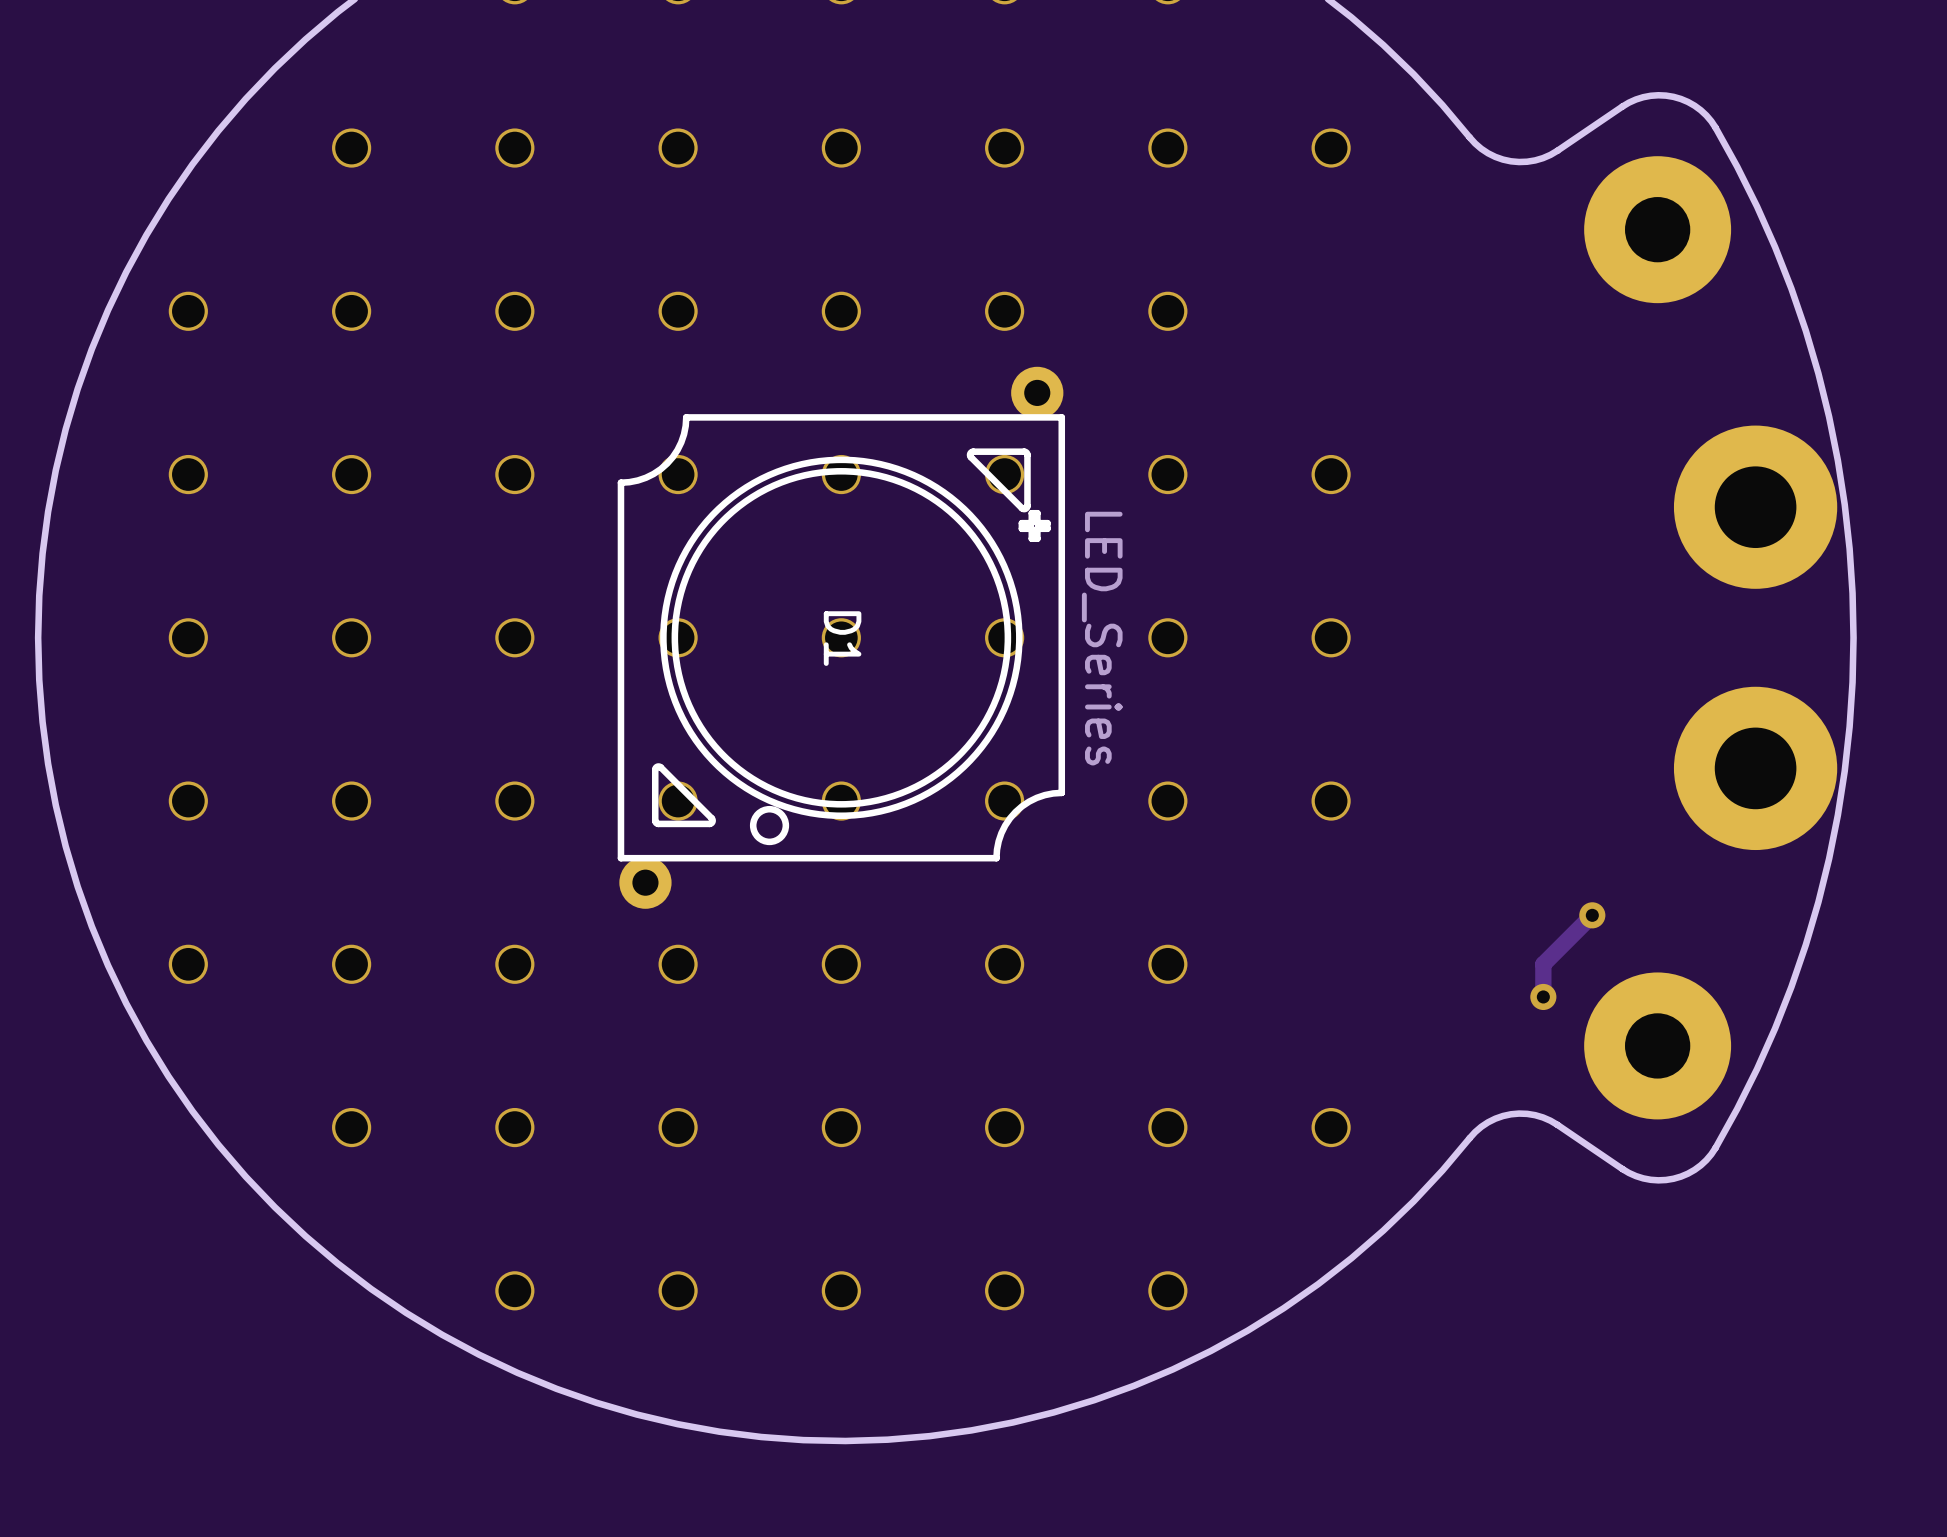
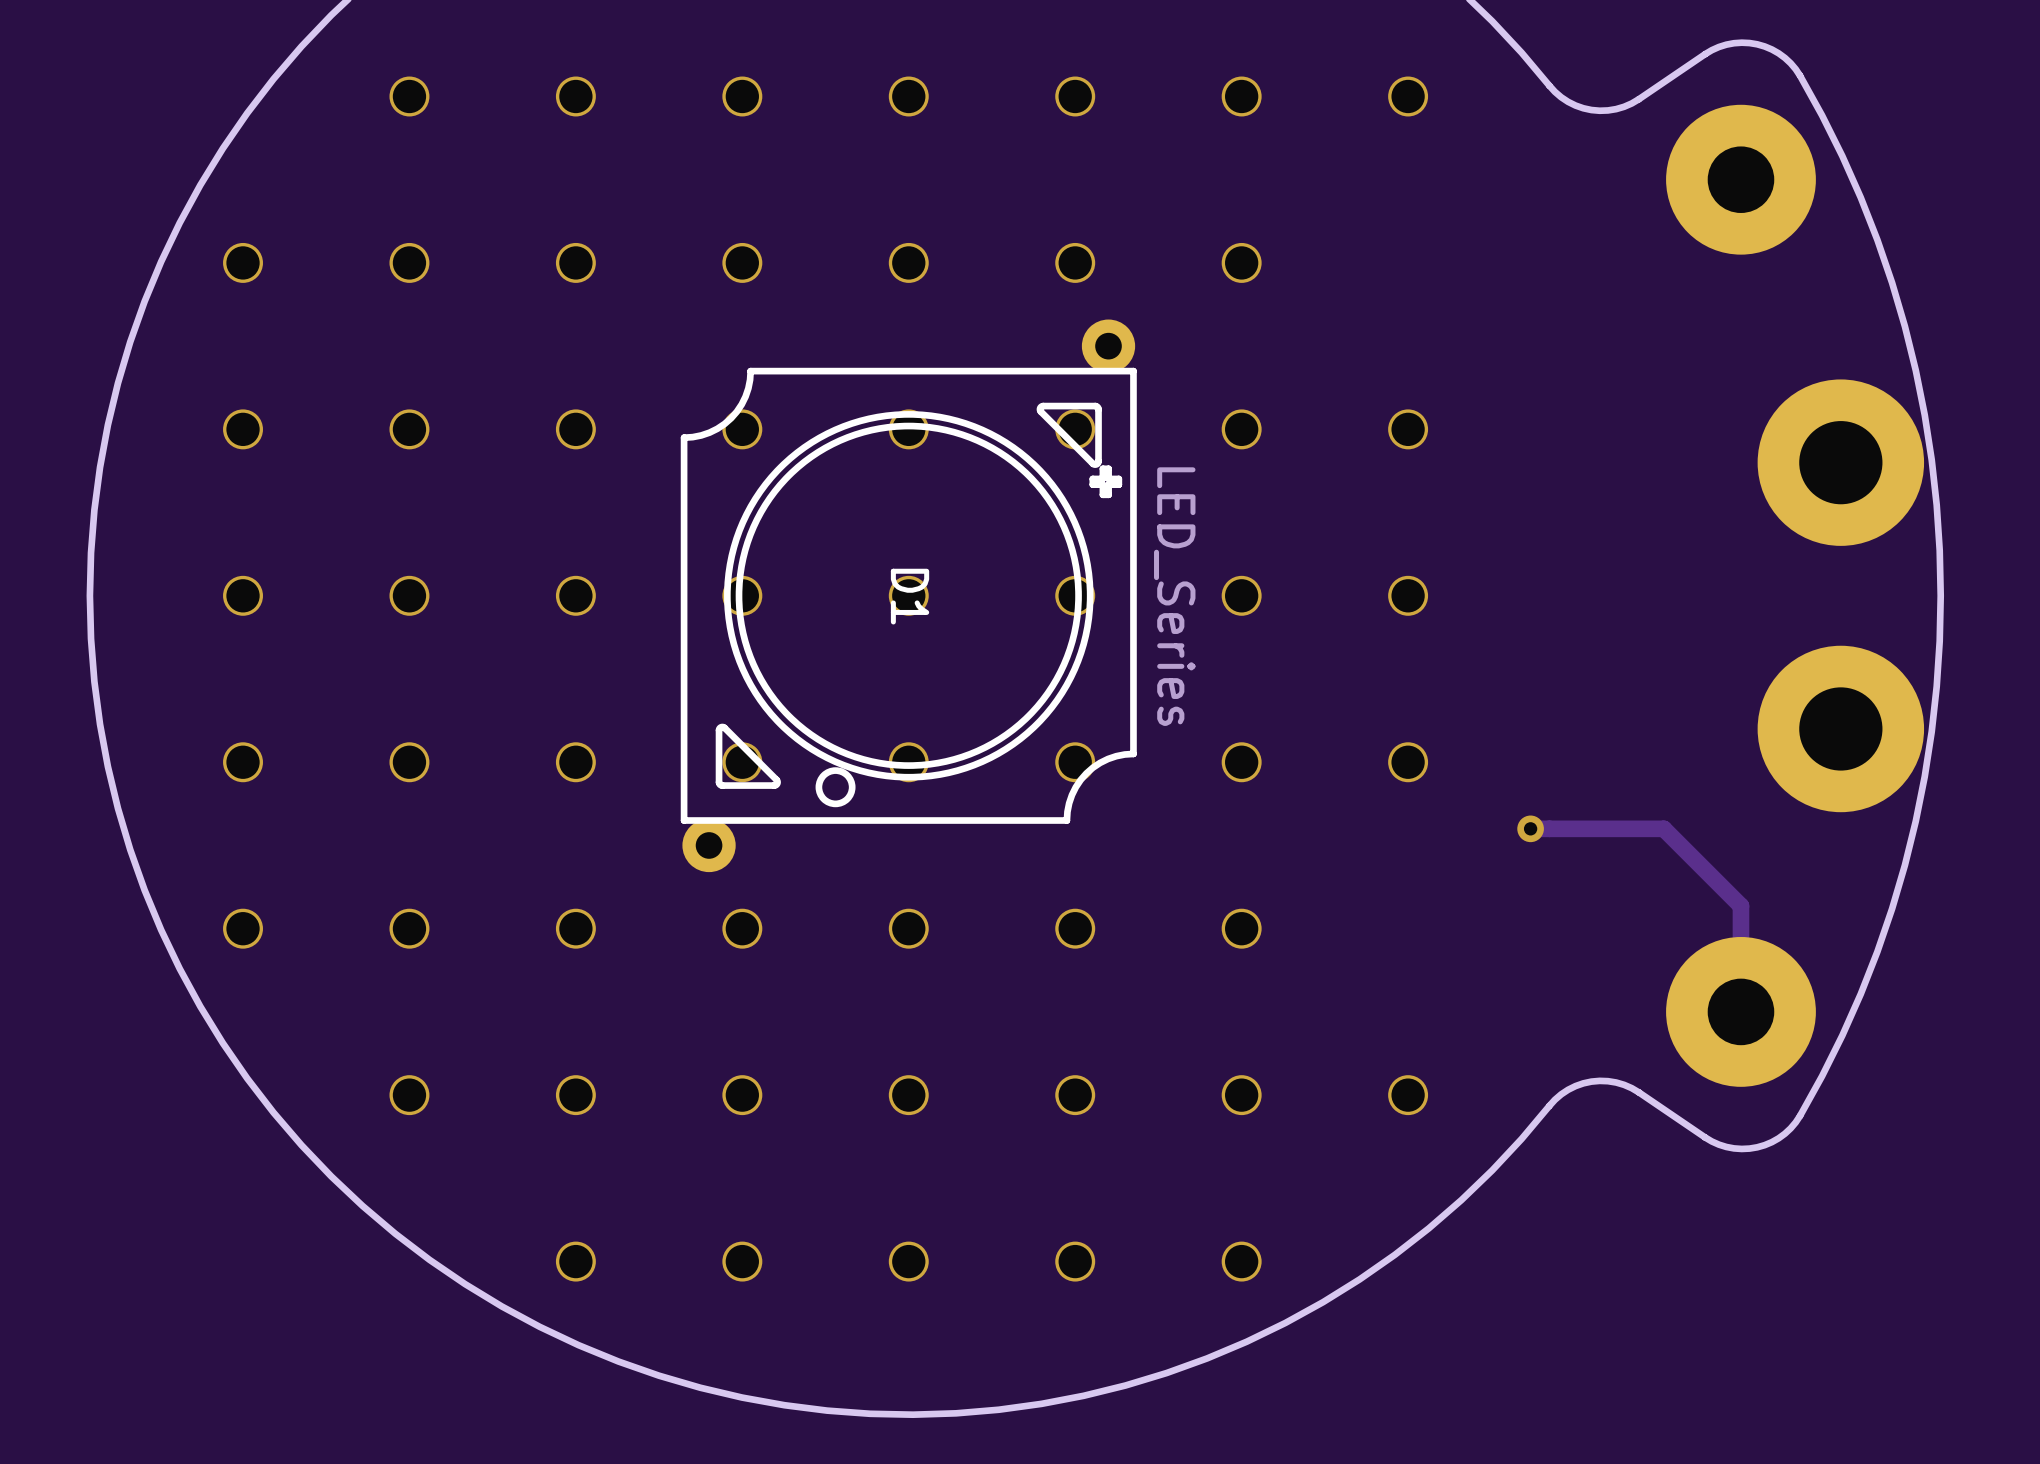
track: none -> (1530, 828) (1663, 828) (1740, 905) (1740, 1011)
via: none -> (1530, 828)
track: (1592, 915) (1543, 964) (1543, 996) -> none
via: (1592, 915) -> none
via: (1543, 996) -> none

